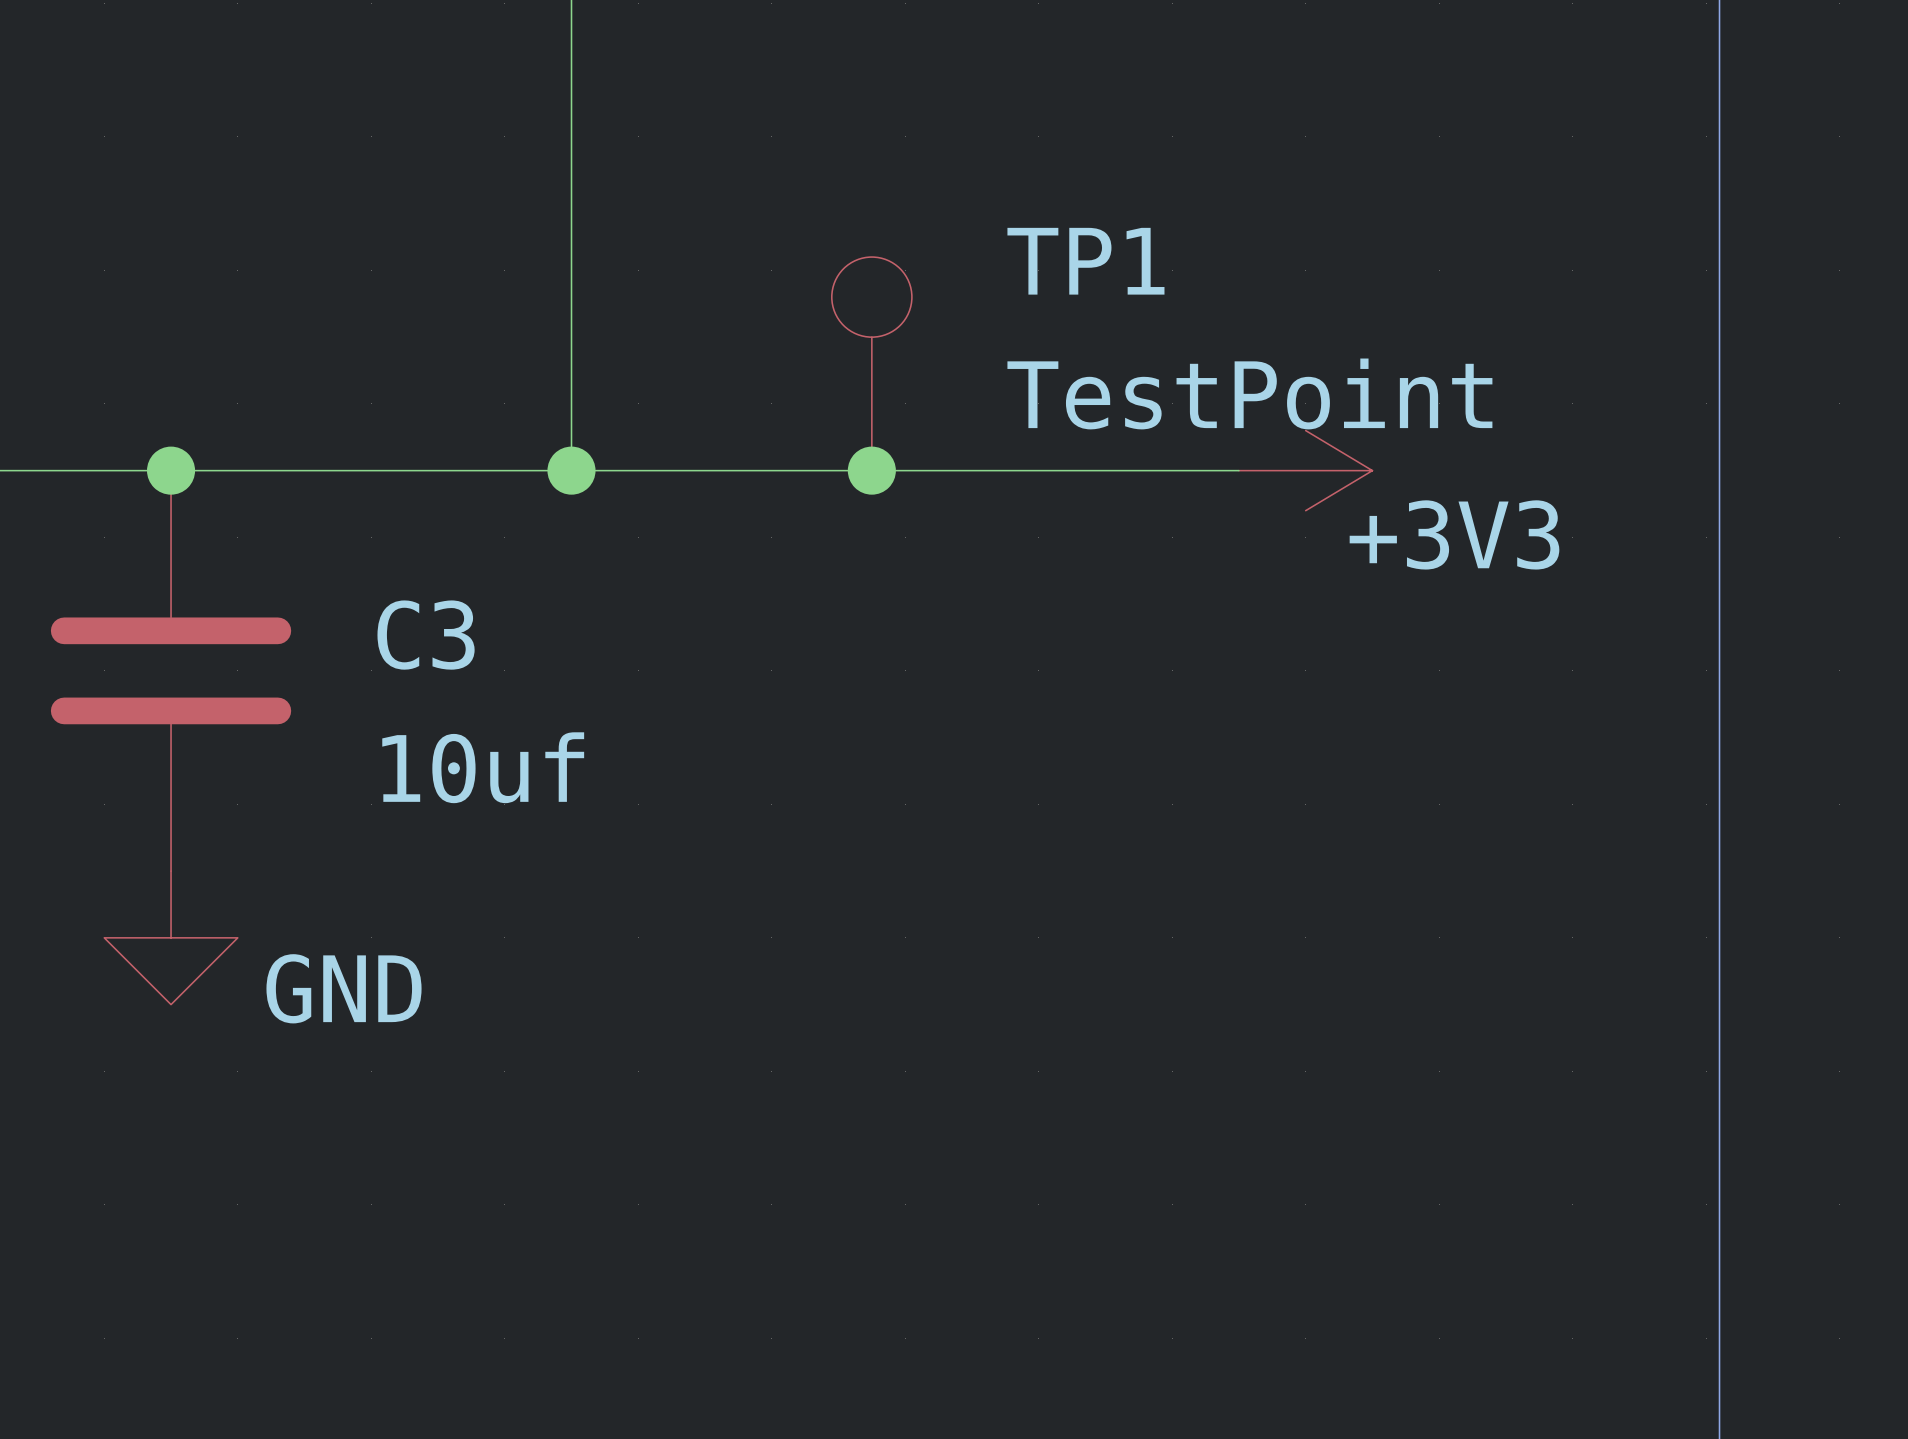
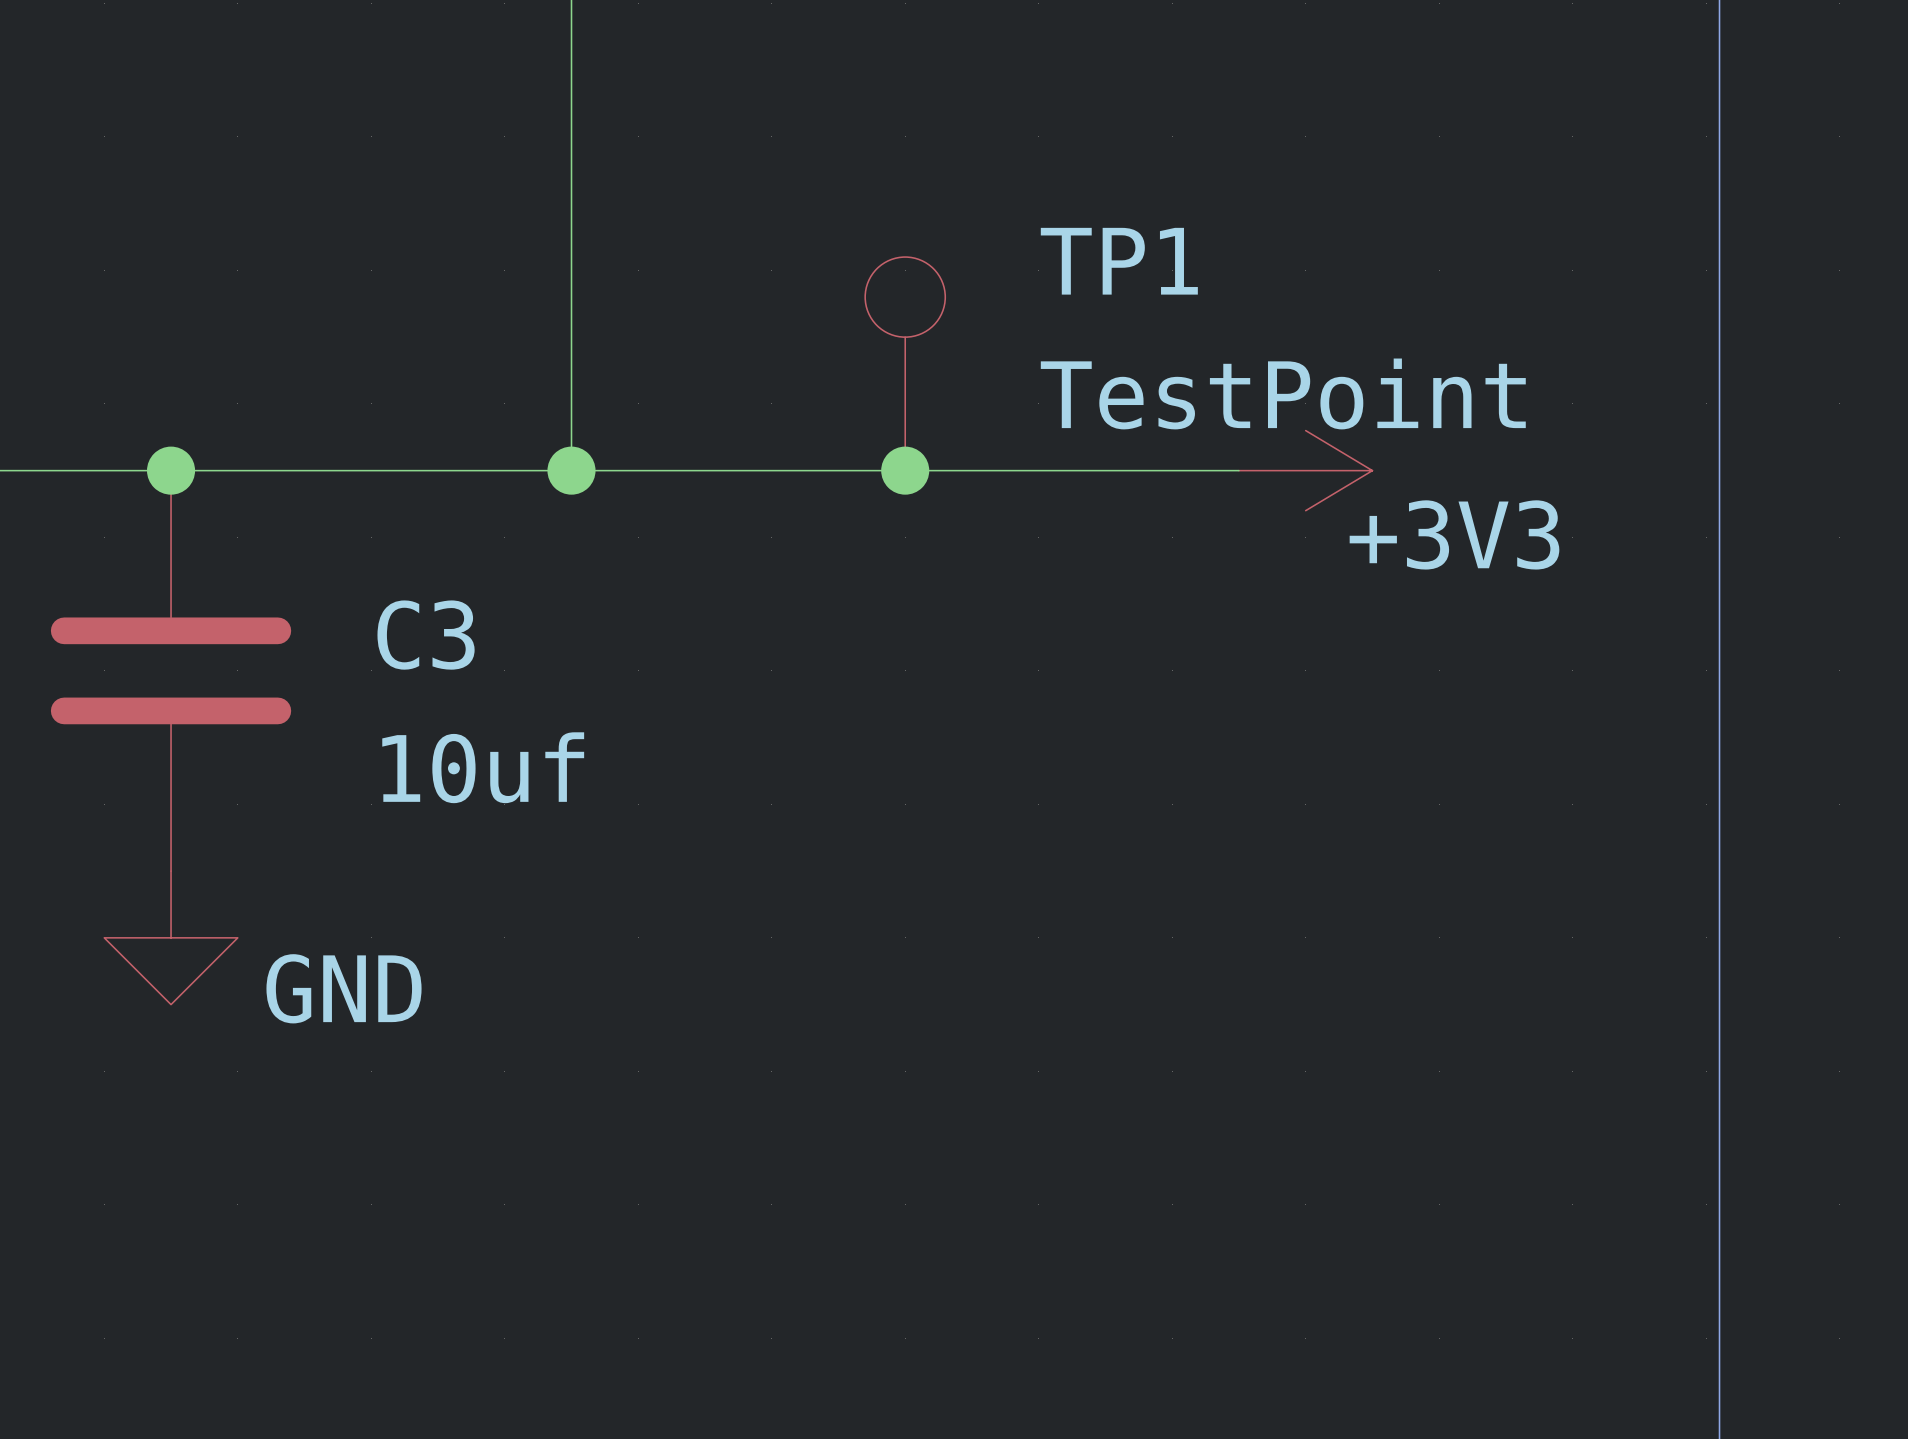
TP1 position: (871, 363) -> (905, 363)
junction position: (871, 470) -> (905, 470)

